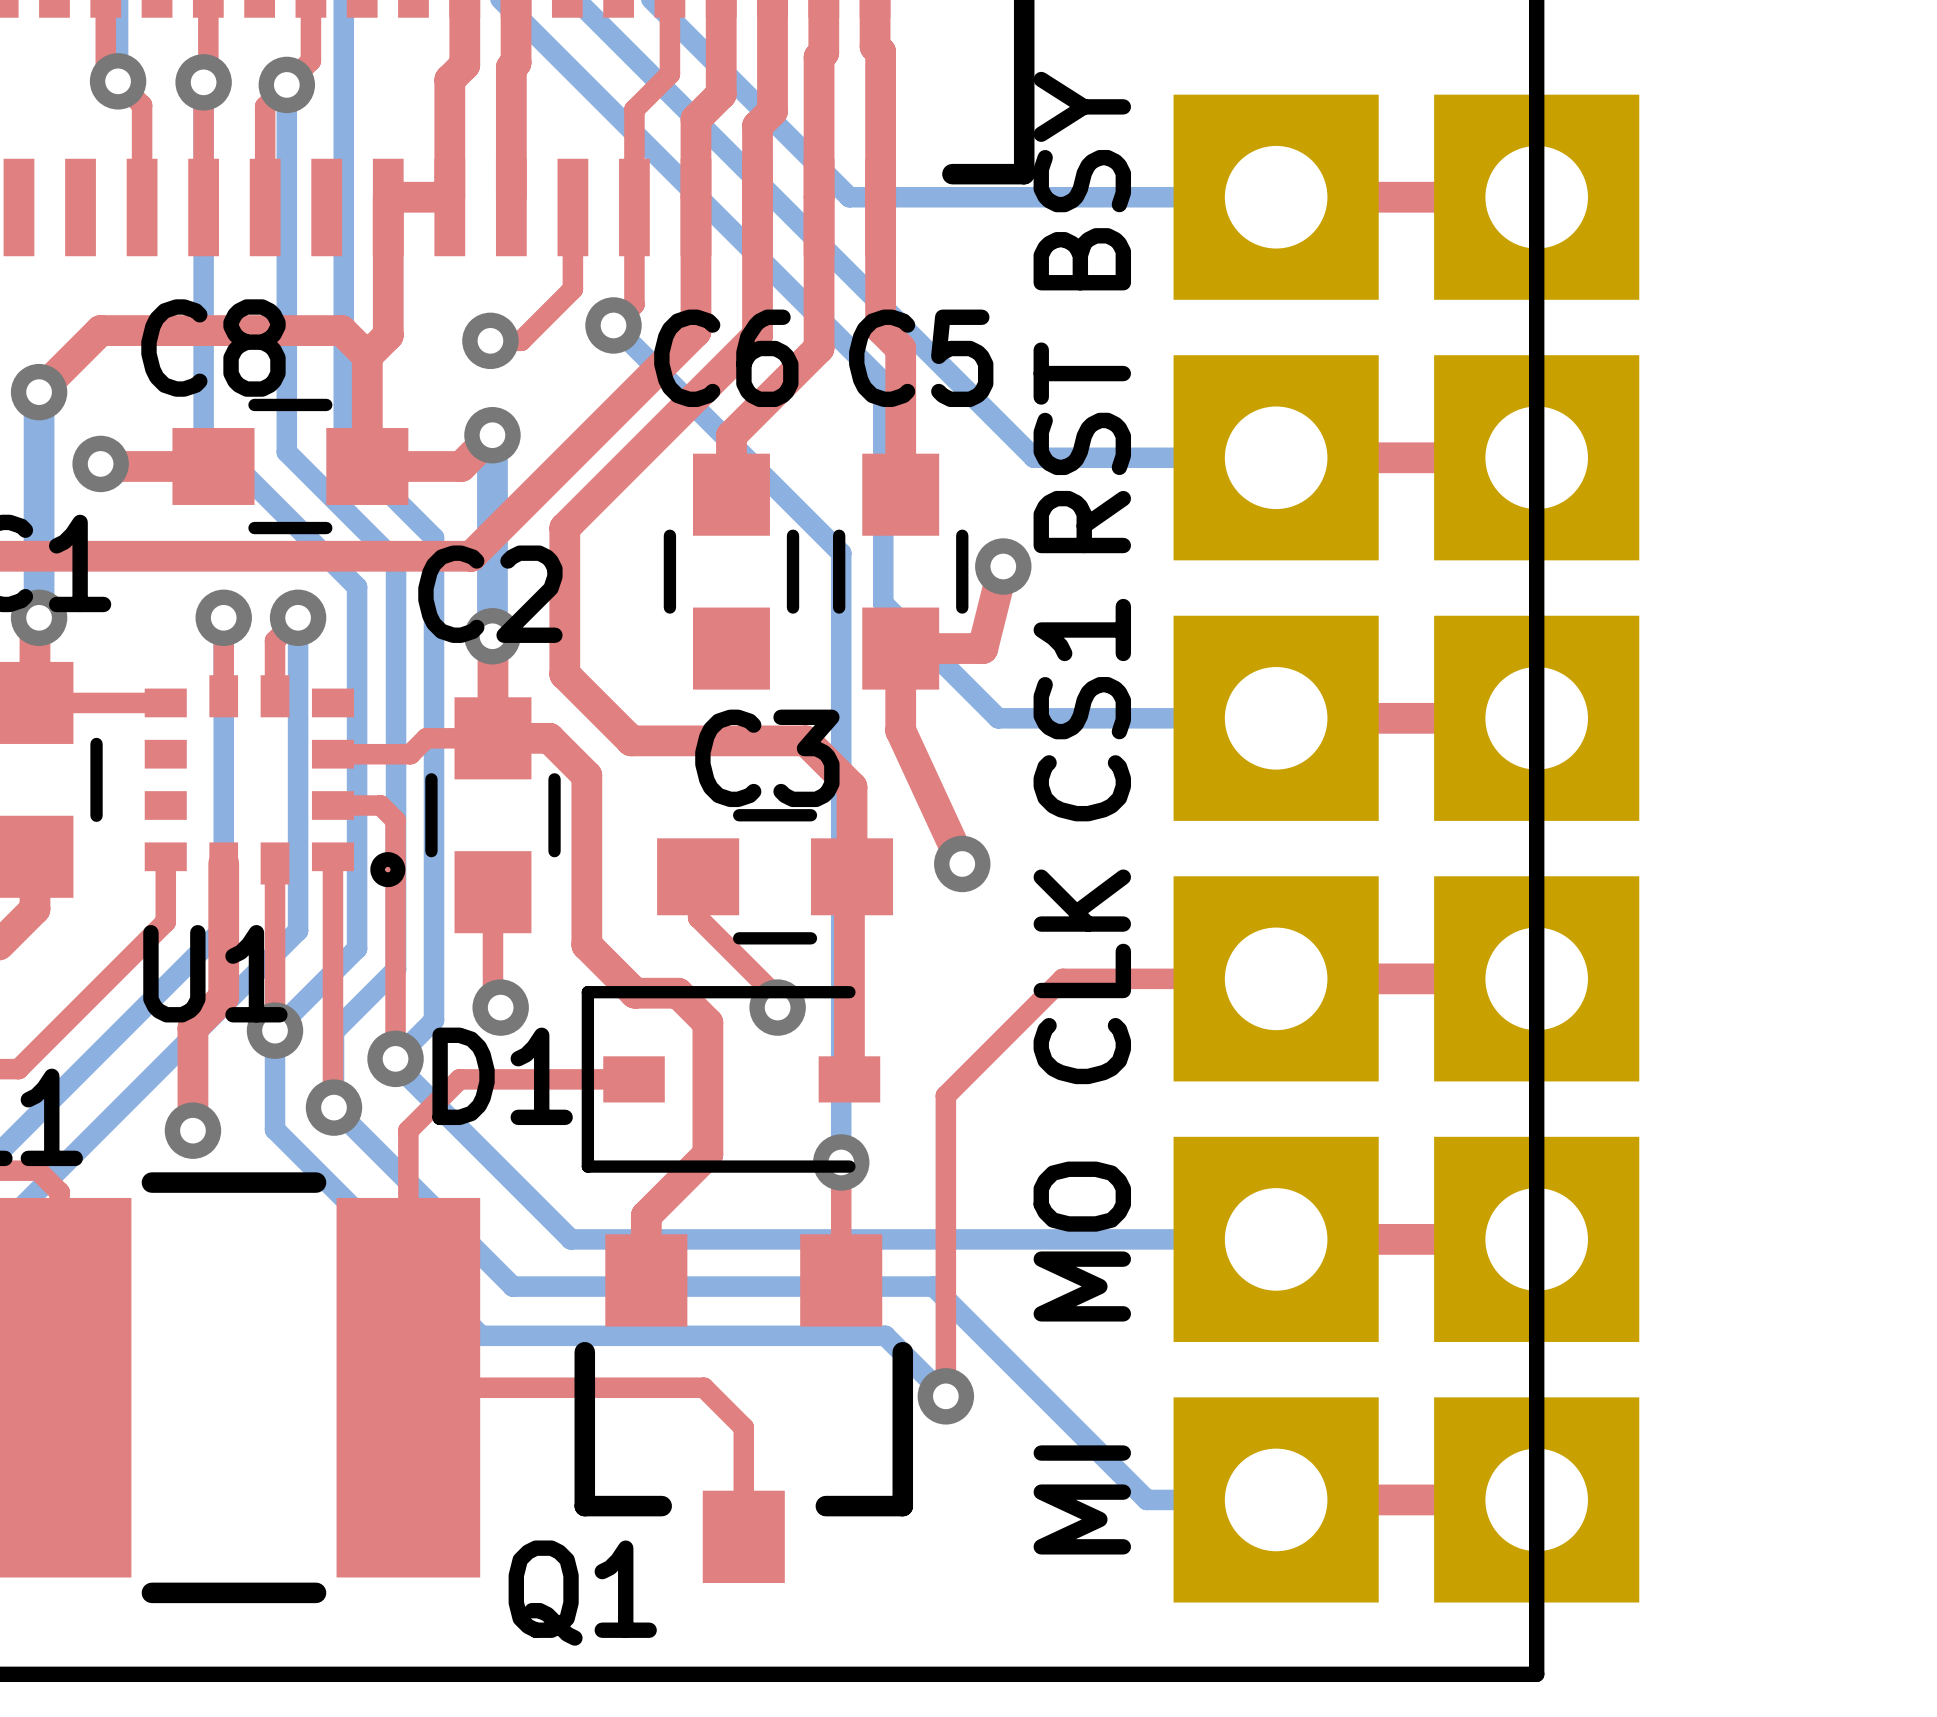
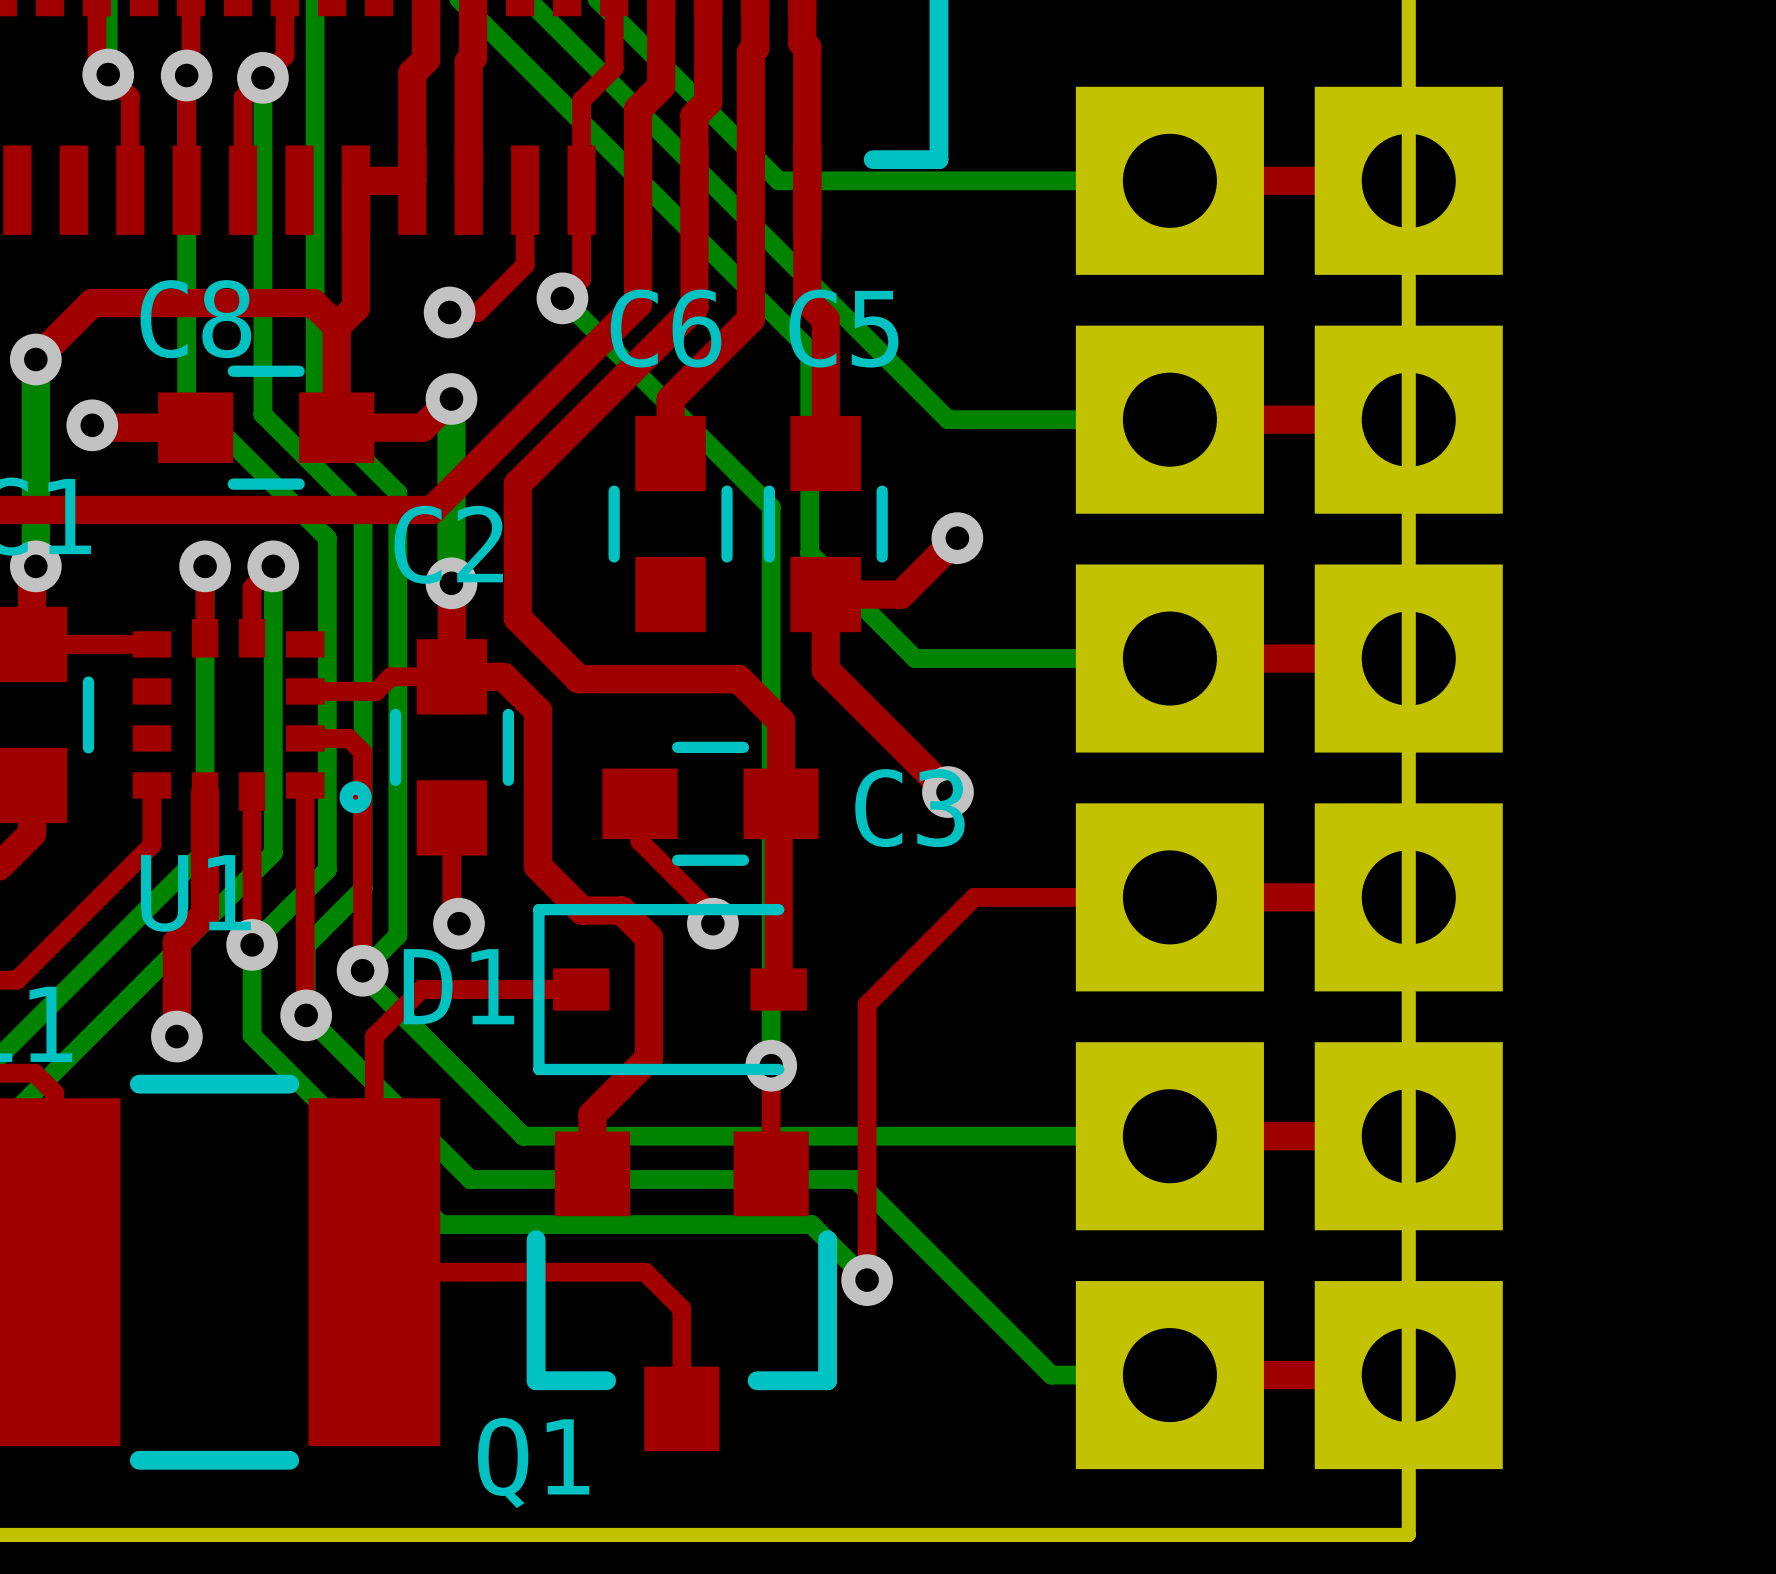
text: BSY (1082, 181) -> none
text: RST (1082, 447) -> none
top track: (1003, 566) (982, 648) -> (957, 538) (900, 594)
via position: (1003, 566) -> (957, 538)
text: CS1 (1082, 710) -> none
top track: (900, 730) (962, 863) -> (825, 669) (947, 792)
C3 name position: C3 (767, 758) -> C3 (909, 808)
via position: (962, 863) -> (947, 792)
text: CLK (1082, 976) -> none
text: MO (1082, 1241) -> none
text: MI (1082, 1499) -> none

